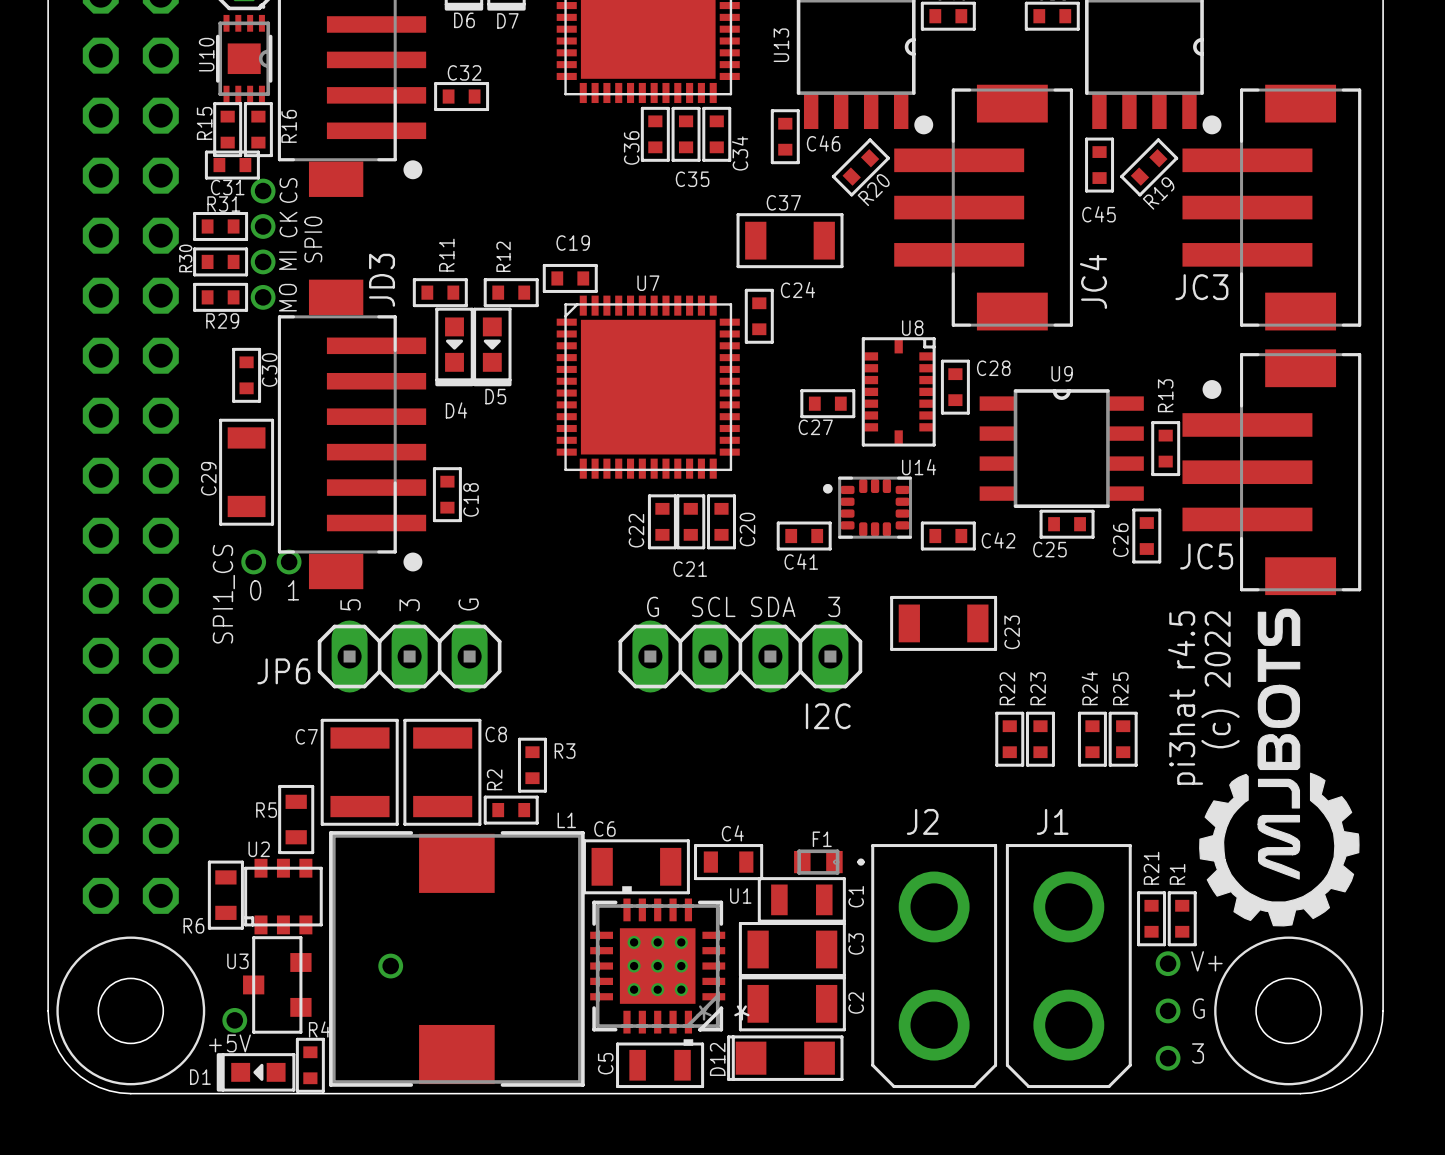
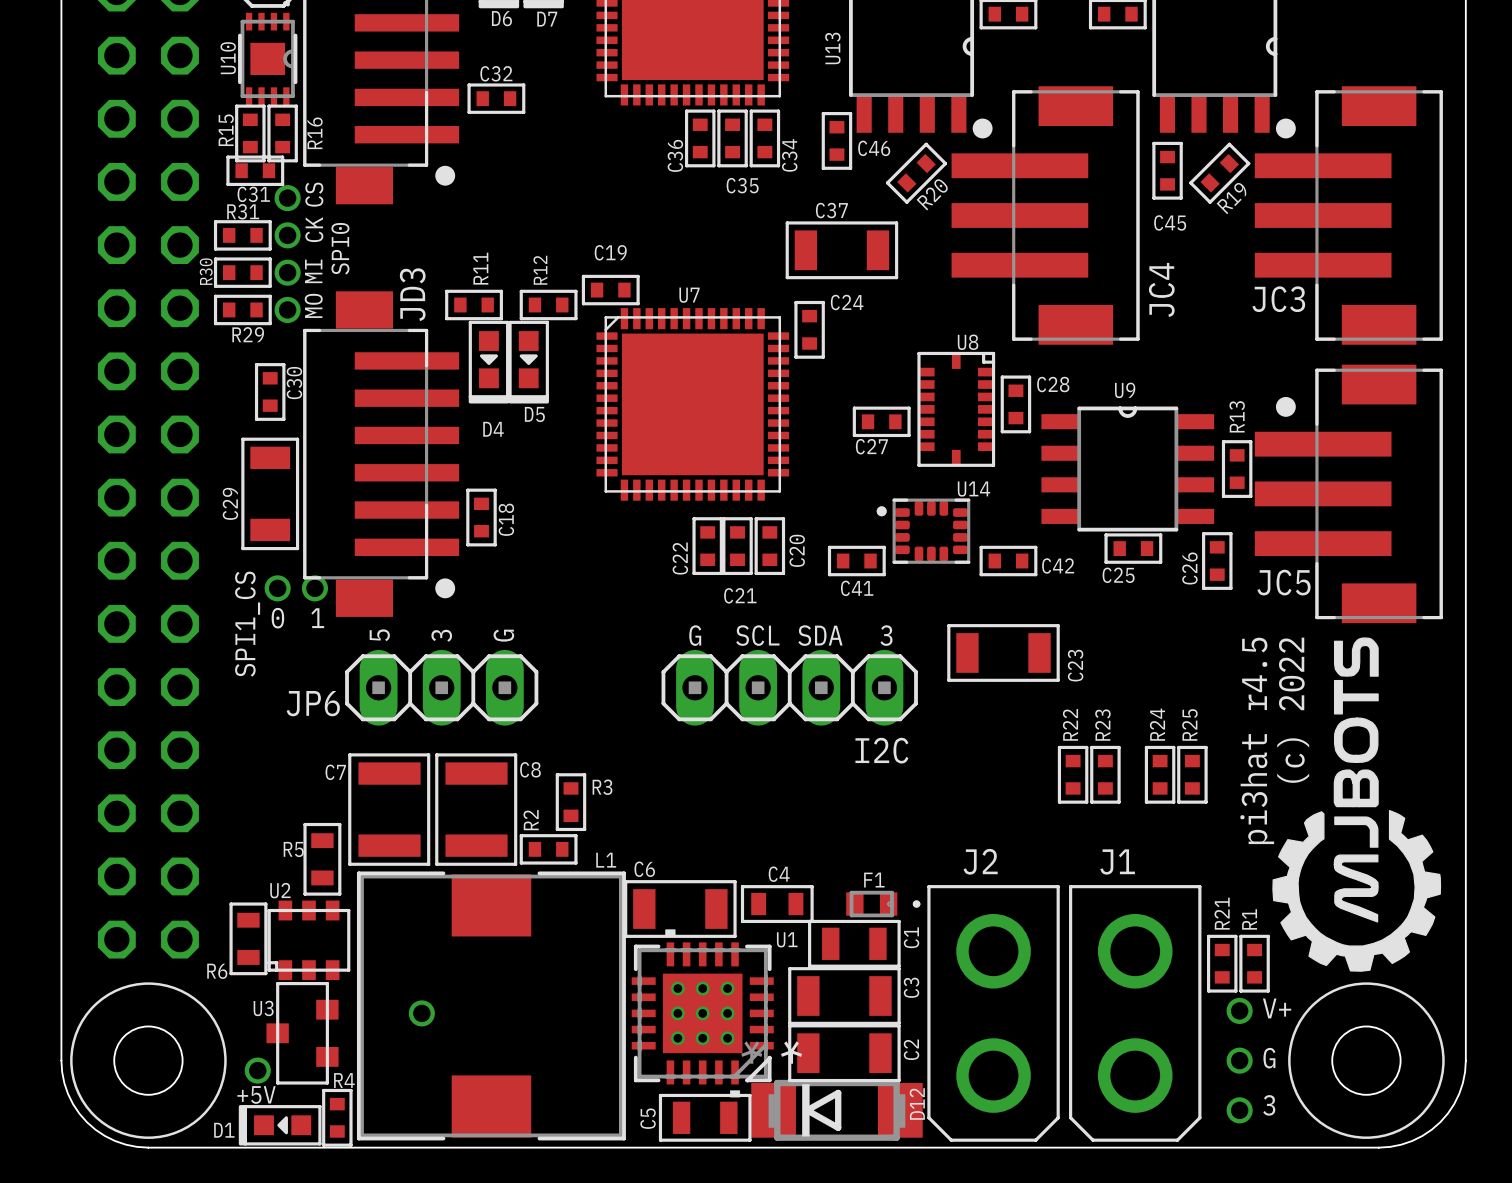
D12 footprint: [727, 1035, 844, 1081] -> [751, 1079, 923, 1141]
D12 name position: D12 (717, 1059) -> D12 (917, 1103)

